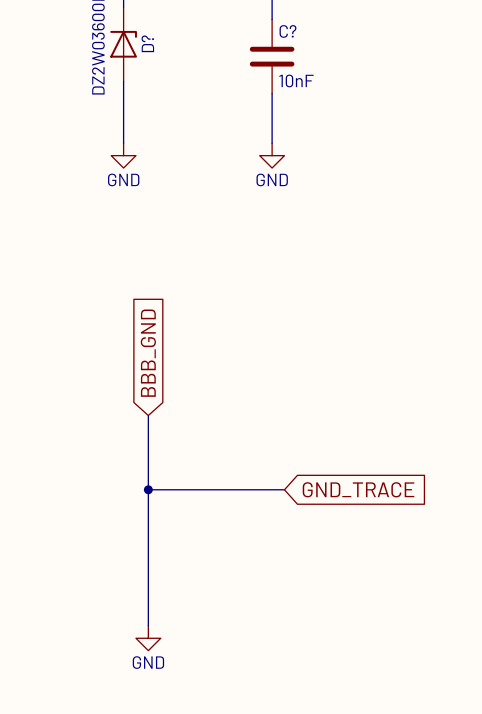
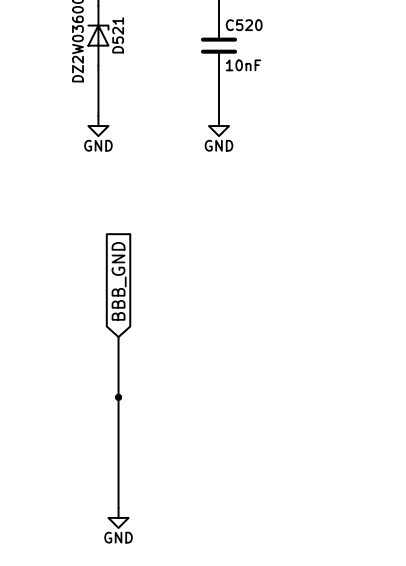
C? name: C? (287, 31) -> C520 (244, 25)
D? name: D? (147, 43) -> D521 (118, 35)
wire: (148, 489) (284, 489) -> none
global label: GND_TRACE (358, 489) -> none

